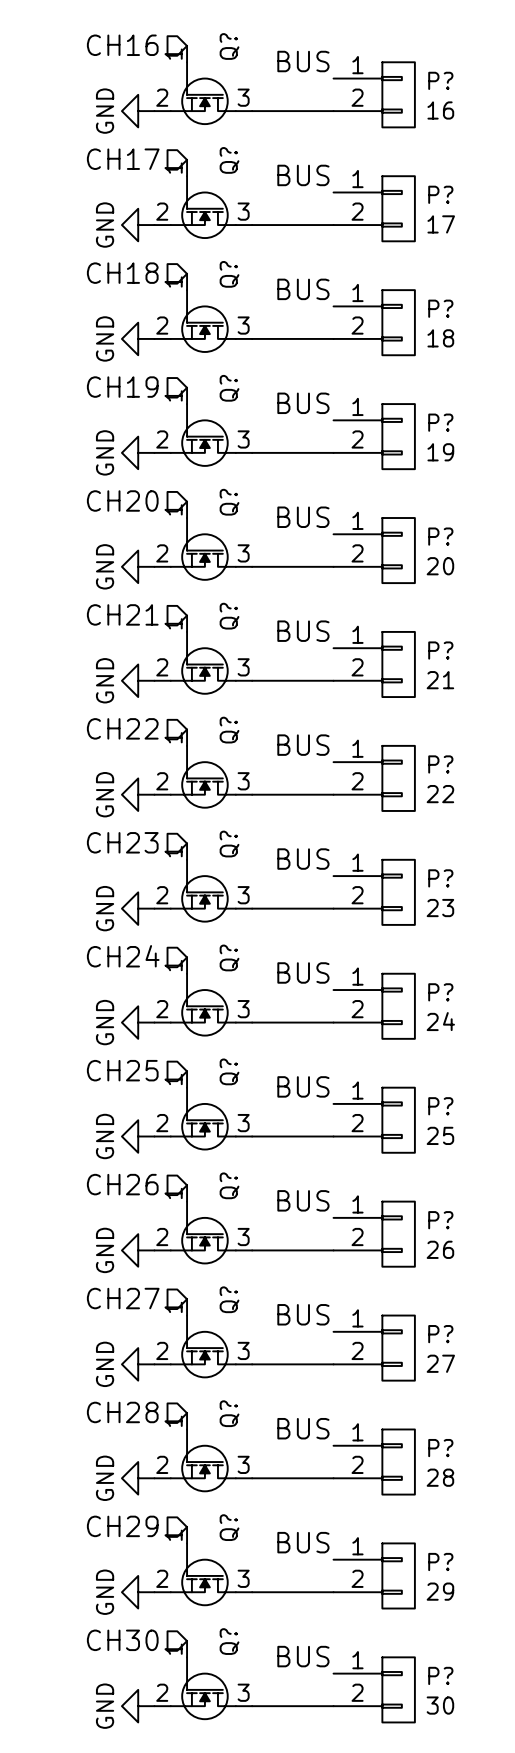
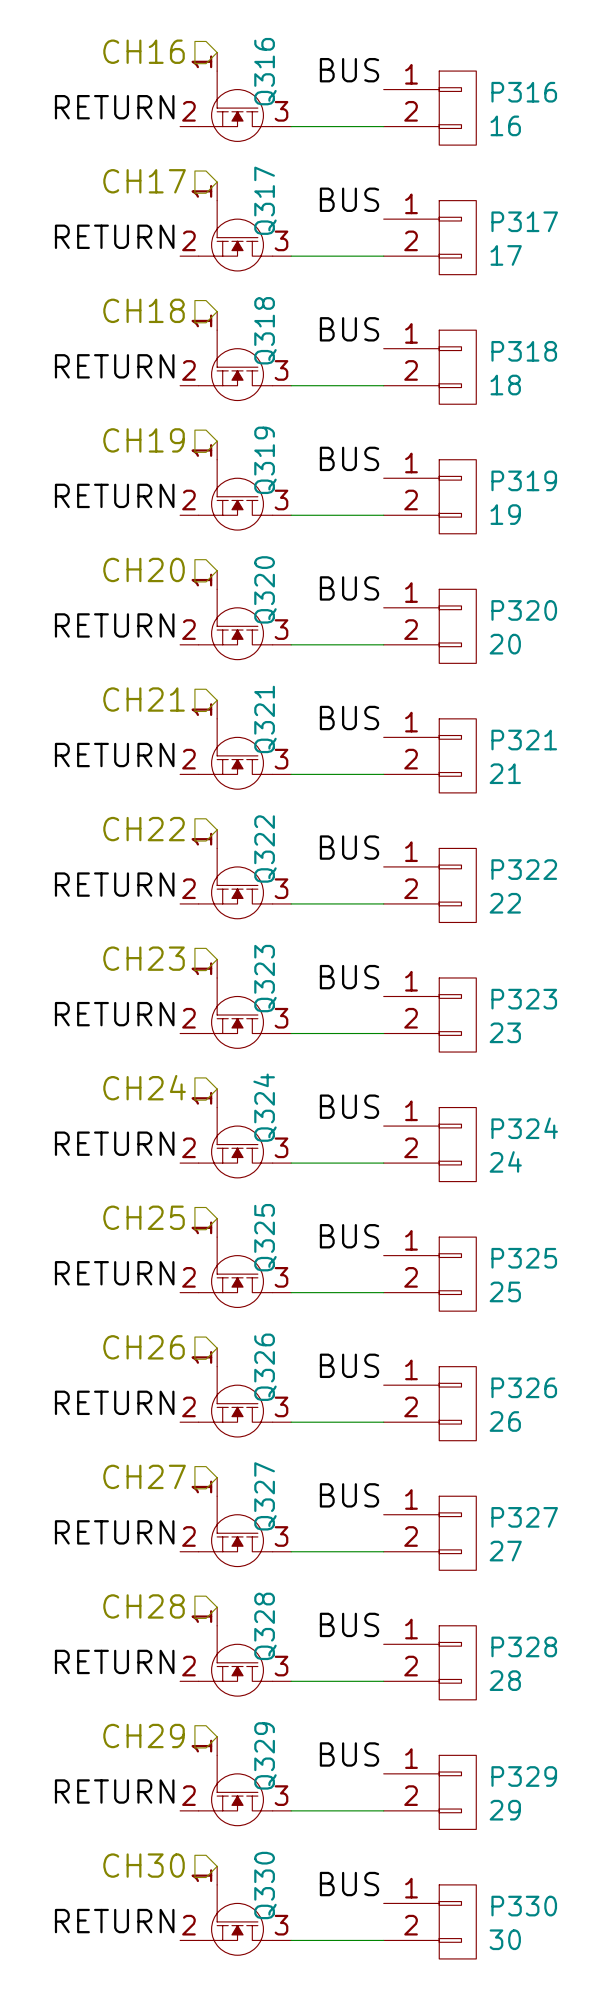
Q? name: Q? (229, 46) -> Q316 (265, 71)
P? name: P? (440, 80) -> P316 (524, 92)
label: none -> RETURN (114, 107)
power symbol: GND (138, 111) -> none
Q? name: Q? (229, 160) -> Q317 (265, 200)
P? name: P? (440, 194) -> P317 (524, 221)
label: none -> RETURN (114, 236)
power symbol: GND (138, 225) -> none
Q? name: Q? (229, 274) -> Q318 (265, 330)
P? name: P? (440, 308) -> P318 (524, 351)
label: none -> RETURN (114, 366)
power symbol: GND (138, 338) -> none
Q? name: Q? (229, 388) -> Q319 (265, 460)
P? name: P? (440, 422) -> P319 (524, 480)
label: none -> RETURN (114, 495)
power symbol: GND (138, 452) -> none
Q? name: Q? (229, 502) -> Q320 (265, 589)
P? name: P? (440, 536) -> P320 (524, 610)
label: none -> RETURN (114, 625)
power symbol: GND (138, 566) -> none
Q? name: Q? (229, 616) -> Q321 (265, 719)
P? name: P? (440, 650) -> P321 (524, 740)
label: none -> RETURN (114, 755)
power symbol: GND (138, 680) -> none
Q? name: Q? (229, 730) -> Q322 (265, 849)
P? name: P? (440, 764) -> P322 (524, 869)
label: none -> RETURN (114, 884)
power symbol: GND (138, 794) -> none
Q? name: Q? (229, 844) -> Q323 (265, 978)
P? name: P? (440, 878) -> P323 (524, 999)
label: none -> RETURN (114, 1014)
power symbol: GND (138, 908) -> none
Q? name: Q? (229, 957) -> Q324 (265, 1107)
P? name: P? (440, 992) -> P324 (524, 1128)
label: none -> RETURN (114, 1143)
power symbol: GND (138, 1022) -> none
Q? name: Q? (229, 1071) -> Q325 (265, 1237)
P? name: P? (440, 1106) -> P325 (524, 1258)
label: none -> RETURN (114, 1273)
power symbol: GND (138, 1136) -> none
Q? name: Q? (229, 1185) -> Q326 (265, 1367)
P? name: P? (440, 1220) -> P326 (524, 1387)
label: none -> RETURN (114, 1402)
power symbol: GND (138, 1250) -> none
Q? name: Q? (229, 1299) -> Q327 (265, 1496)
P? name: P? (440, 1334) -> P327 (524, 1517)
label: none -> RETURN (114, 1532)
power symbol: GND (138, 1364) -> none
Q? name: Q? (229, 1413) -> Q328 (265, 1626)
P? name: P? (440, 1448) -> P328 (524, 1646)
label: none -> RETURN (114, 1661)
power symbol: GND (138, 1478) -> none
Q? name: Q? (229, 1527) -> Q329 (265, 1755)
P? name: P? (440, 1562) -> P329 (524, 1776)
label: none -> RETURN (114, 1791)
power symbol: GND (138, 1592) -> none
Q? name: Q? (229, 1641) -> Q330 (265, 1885)
P? name: P? (440, 1675) -> P330 (524, 1906)
label: none -> RETURN (114, 1921)
power symbol: GND (138, 1706) -> none

